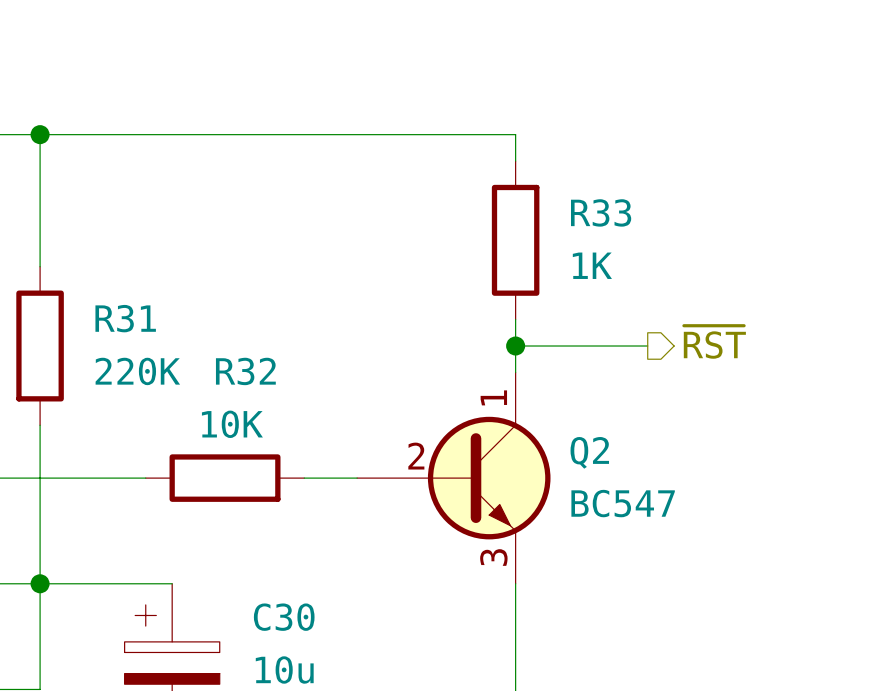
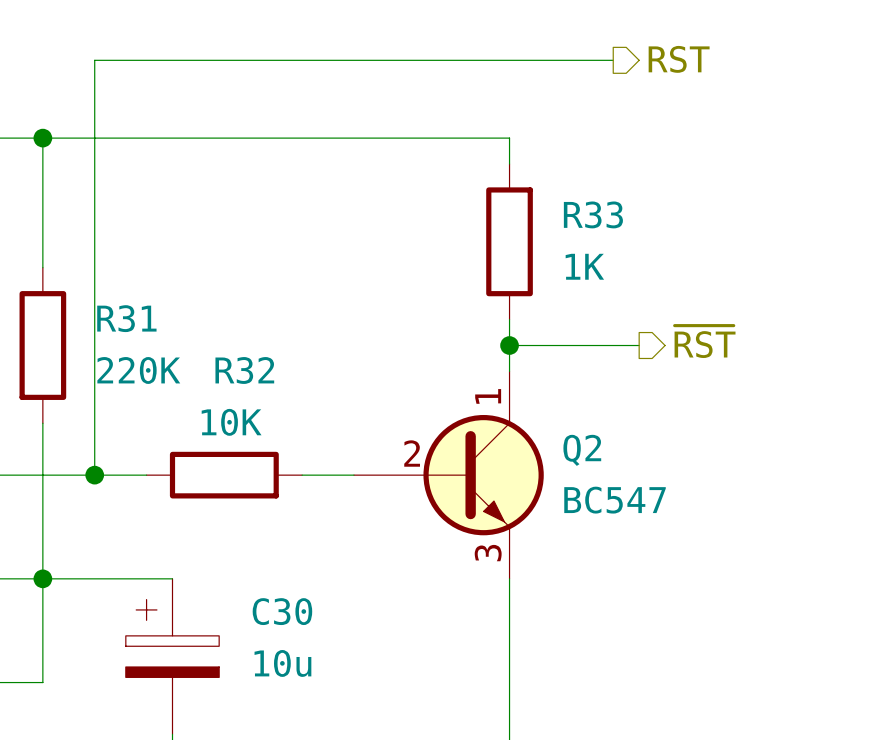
hierarchical label: none -> RST (679, 59)
wire: none -> (613, 60) (94, 60) (94, 475)
junction: none -> (94, 475)

